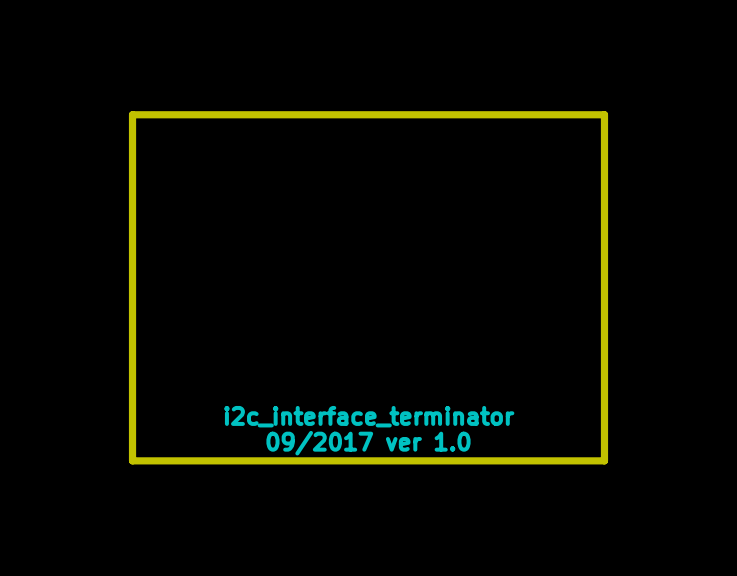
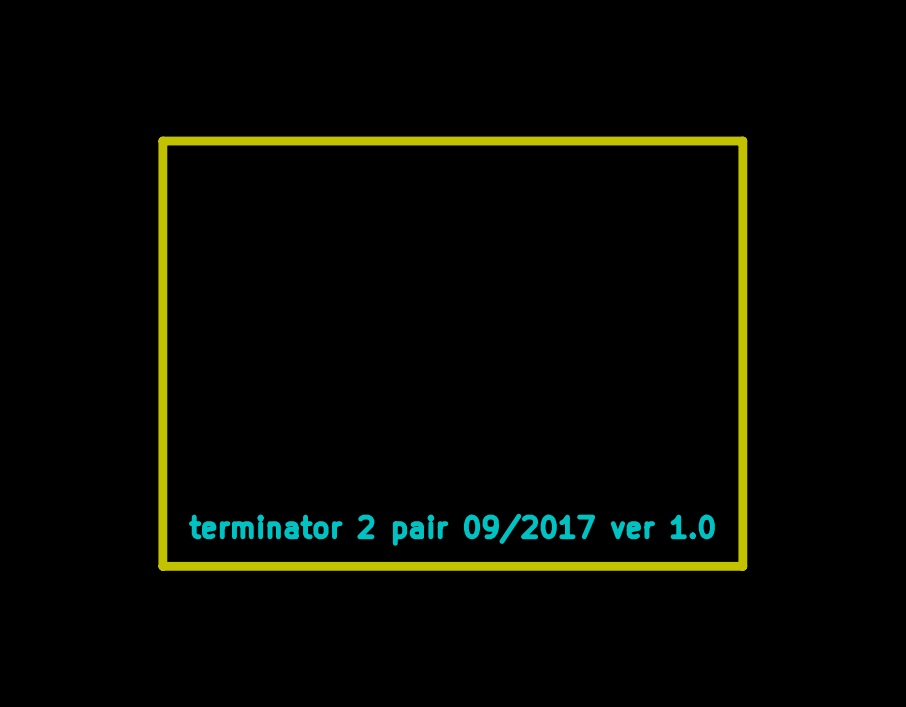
text: i2c_interface_terminator (369, 416) -> none
text: 09/2017 ver 1.0 (368, 443) -> terminator 2 pair 09/2017 ver 1.0 (451, 529)

